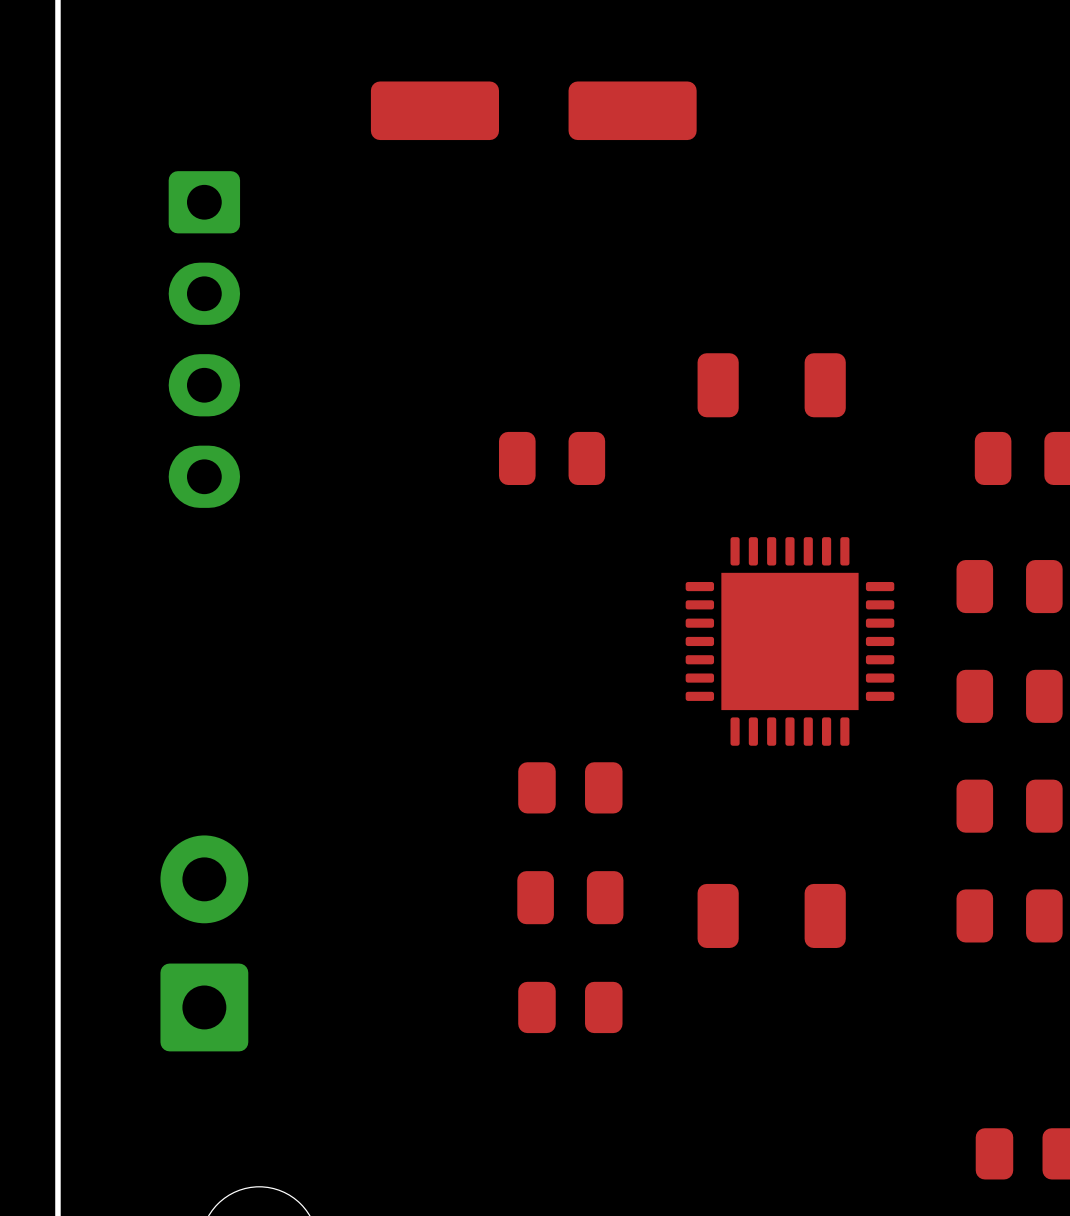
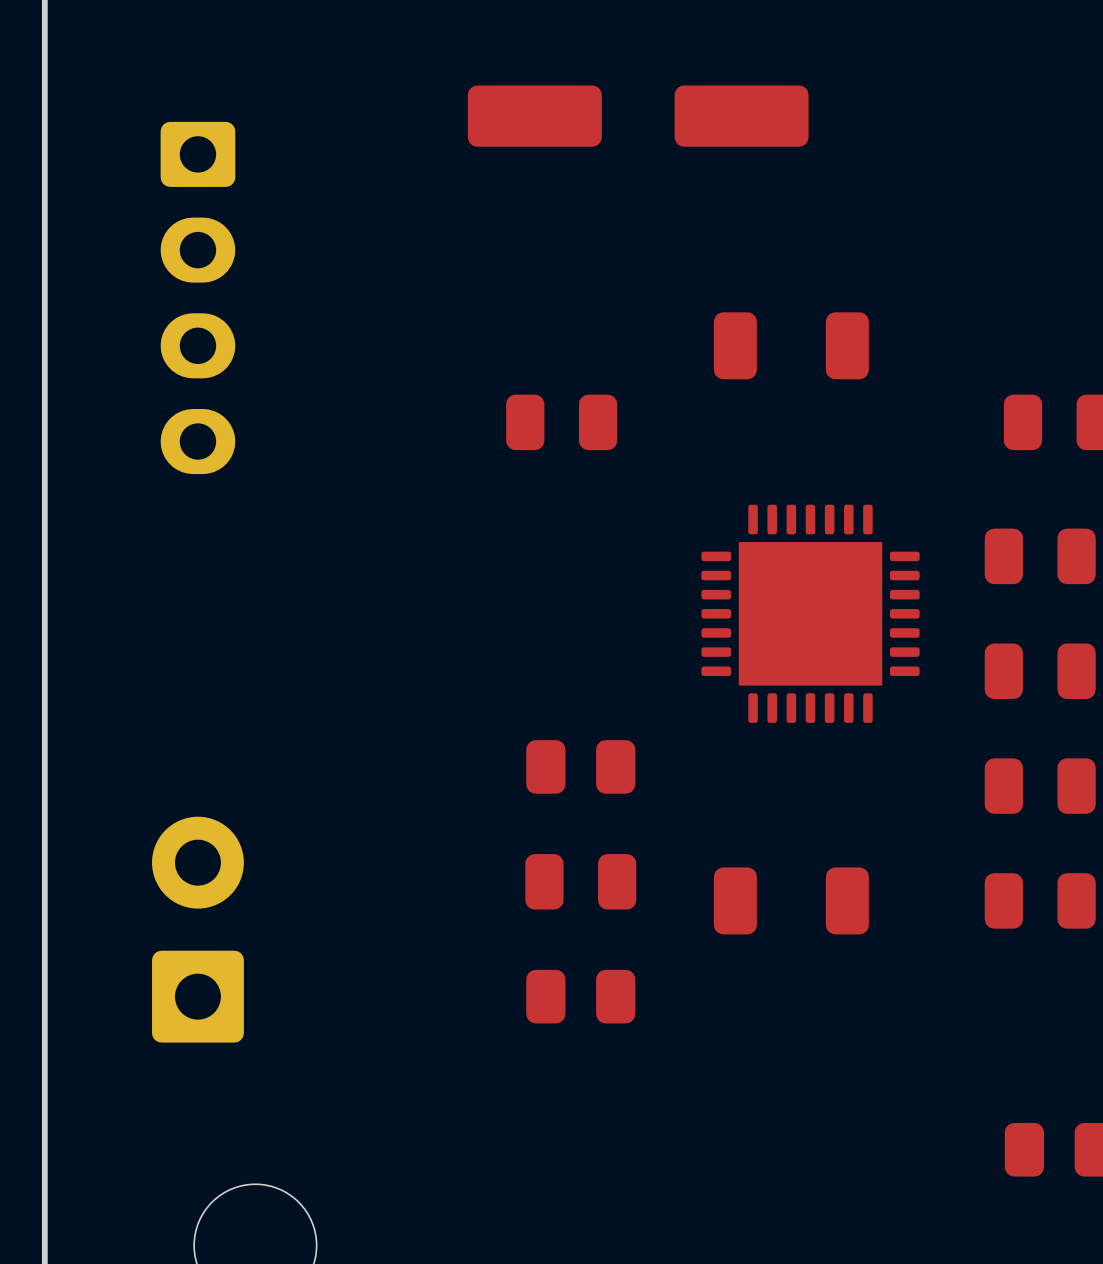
part position: (533, 110) -> (638, 116)

